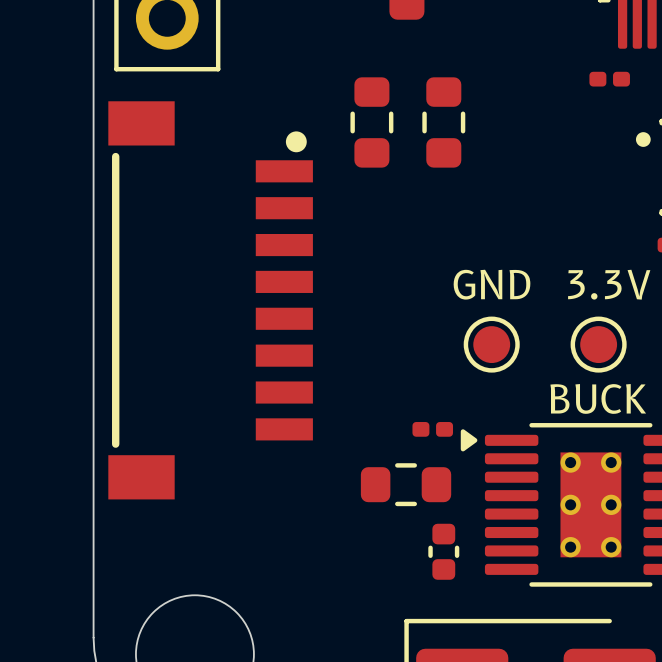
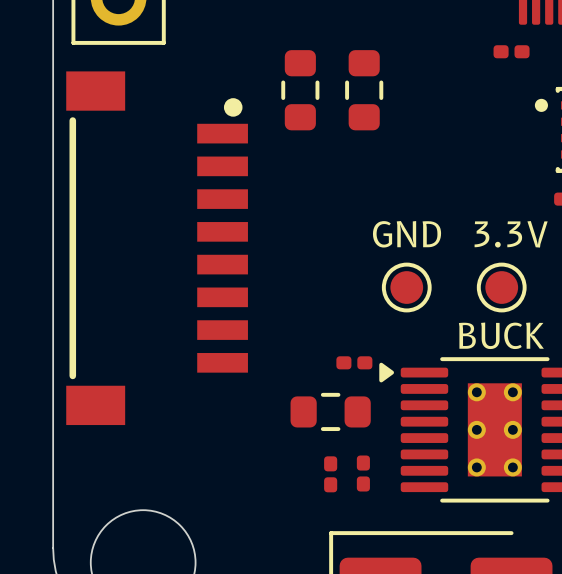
part footprint: [428, 523, 460, 580] -> [356, 455, 370, 492]
part: none -> (330, 474)

